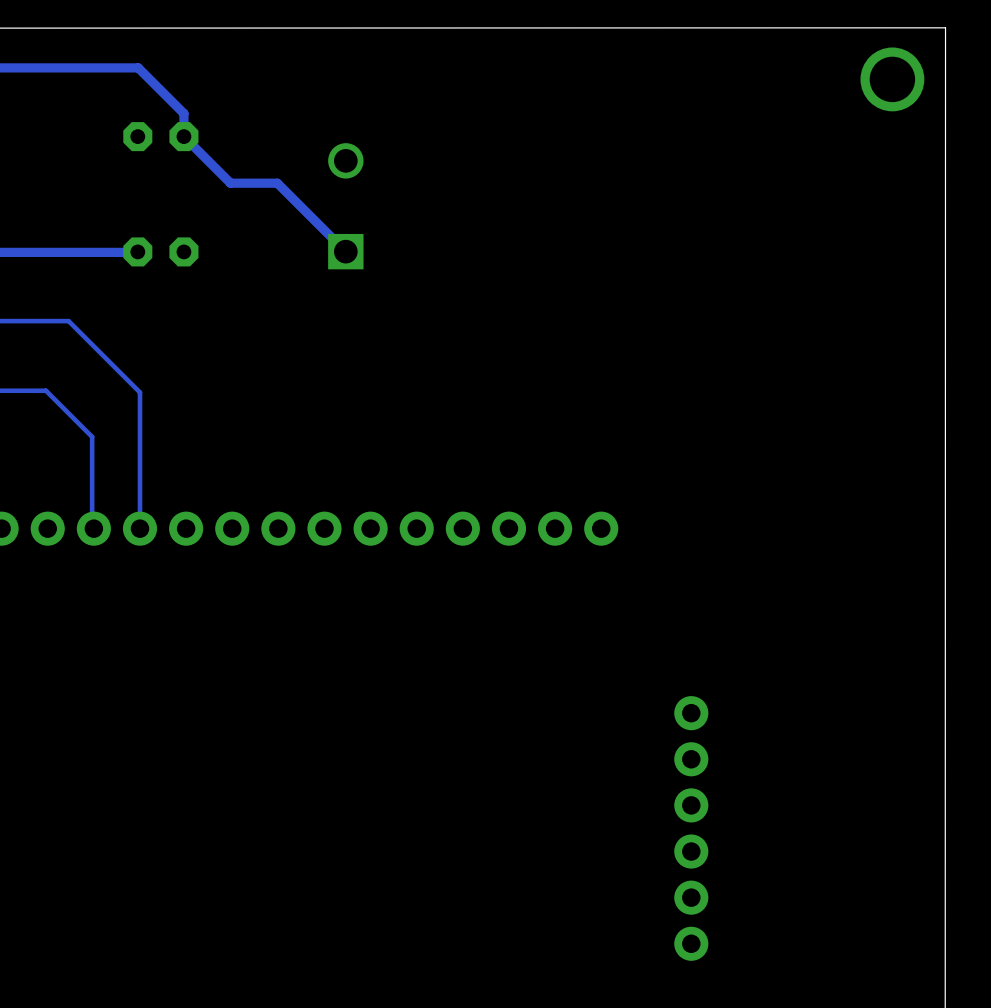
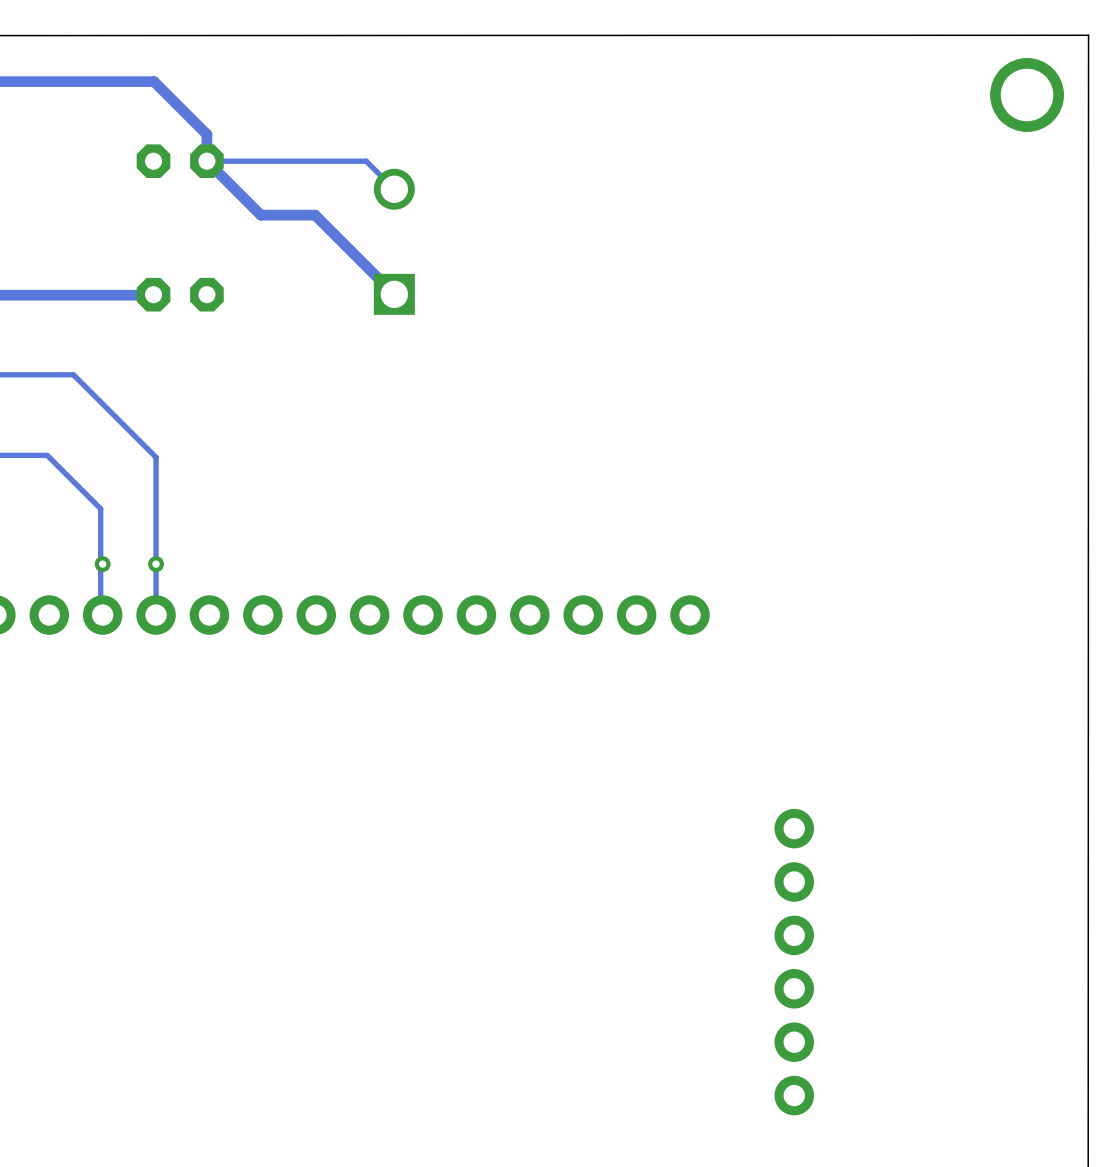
track: none -> (206, 161) (366, 161) (394, 189)
via: none -> (102, 564)
via: none -> (156, 564)

